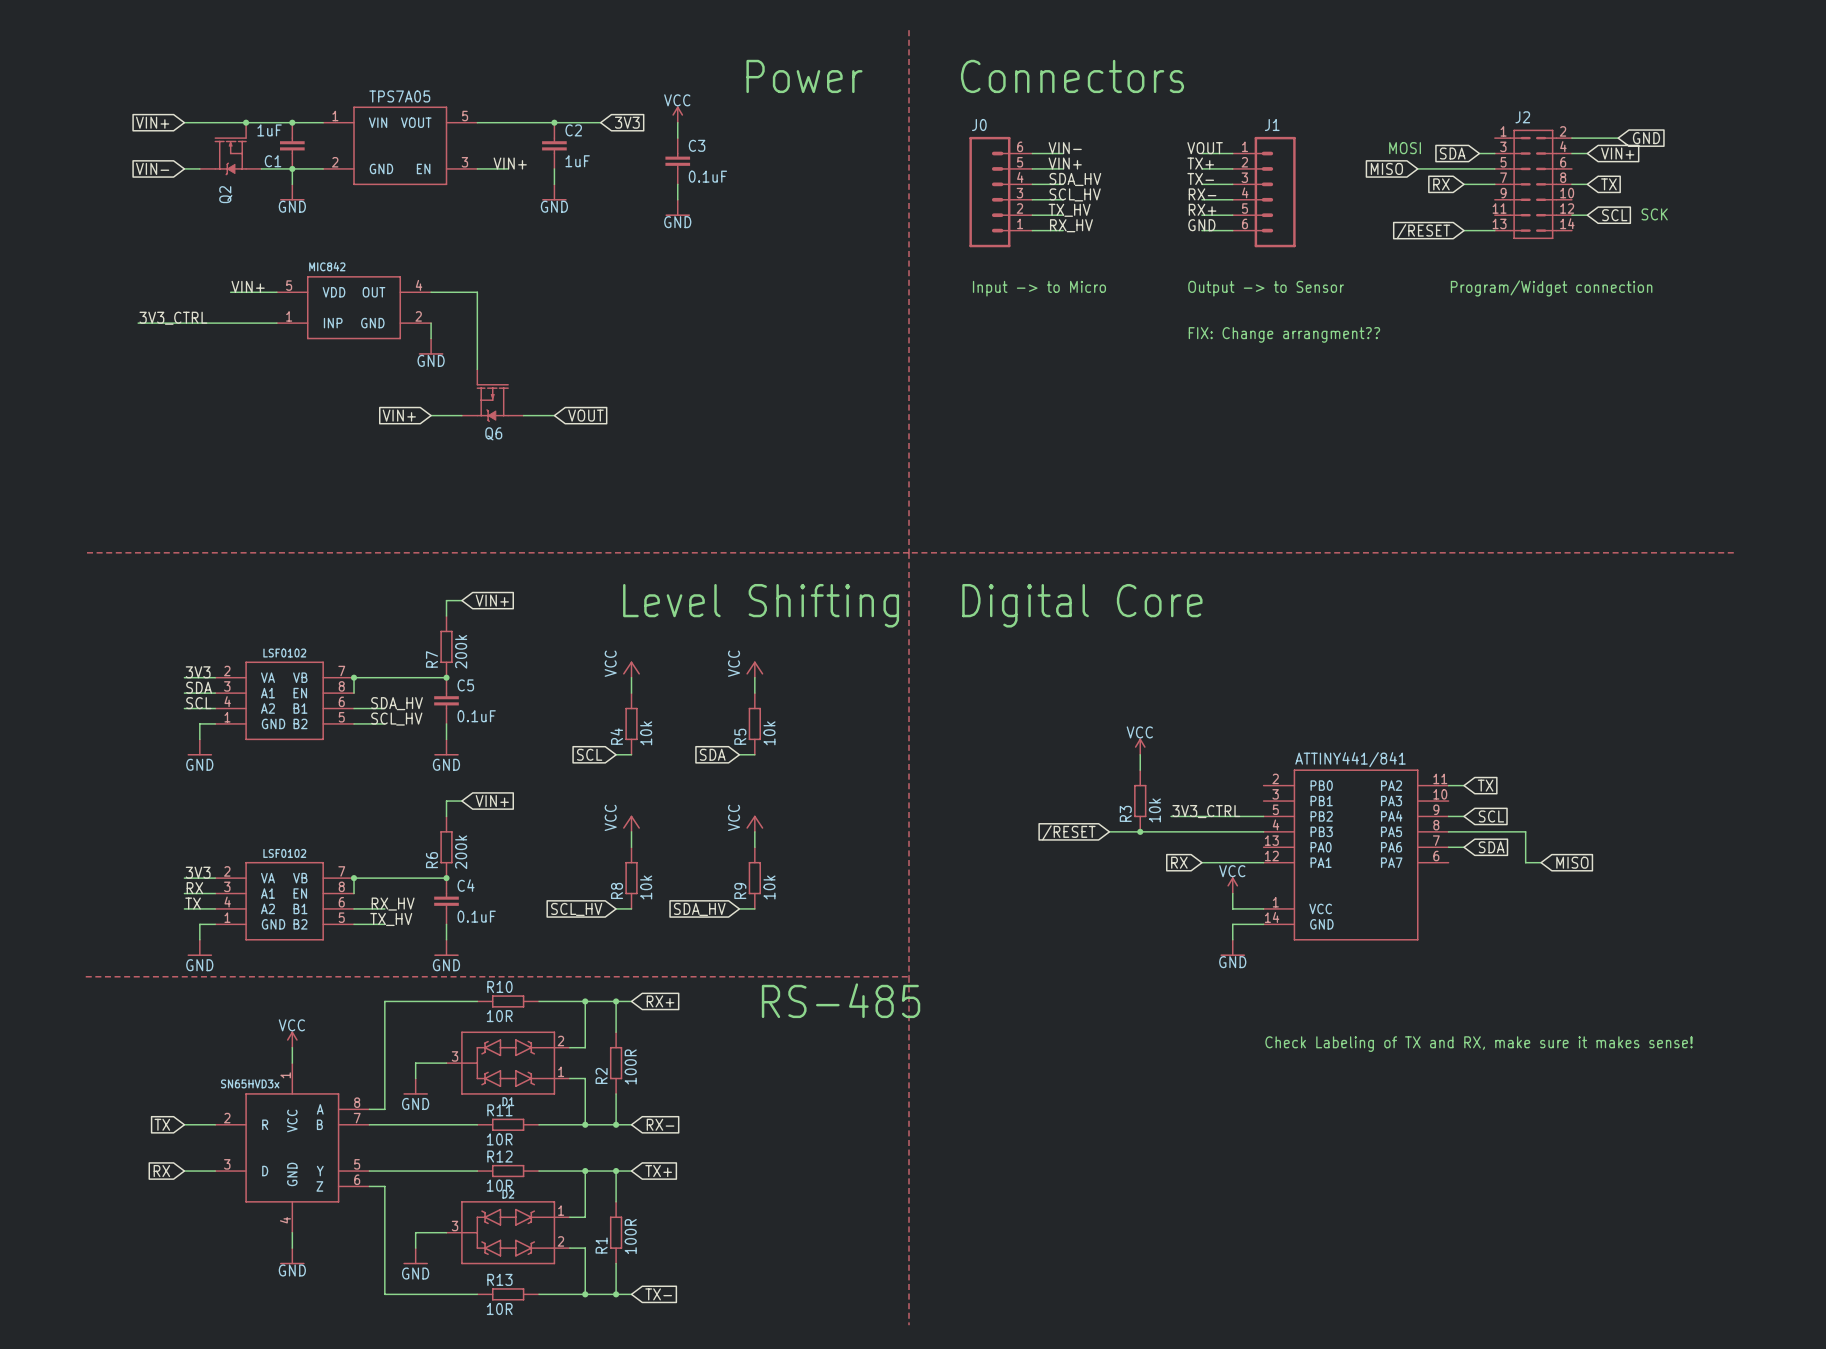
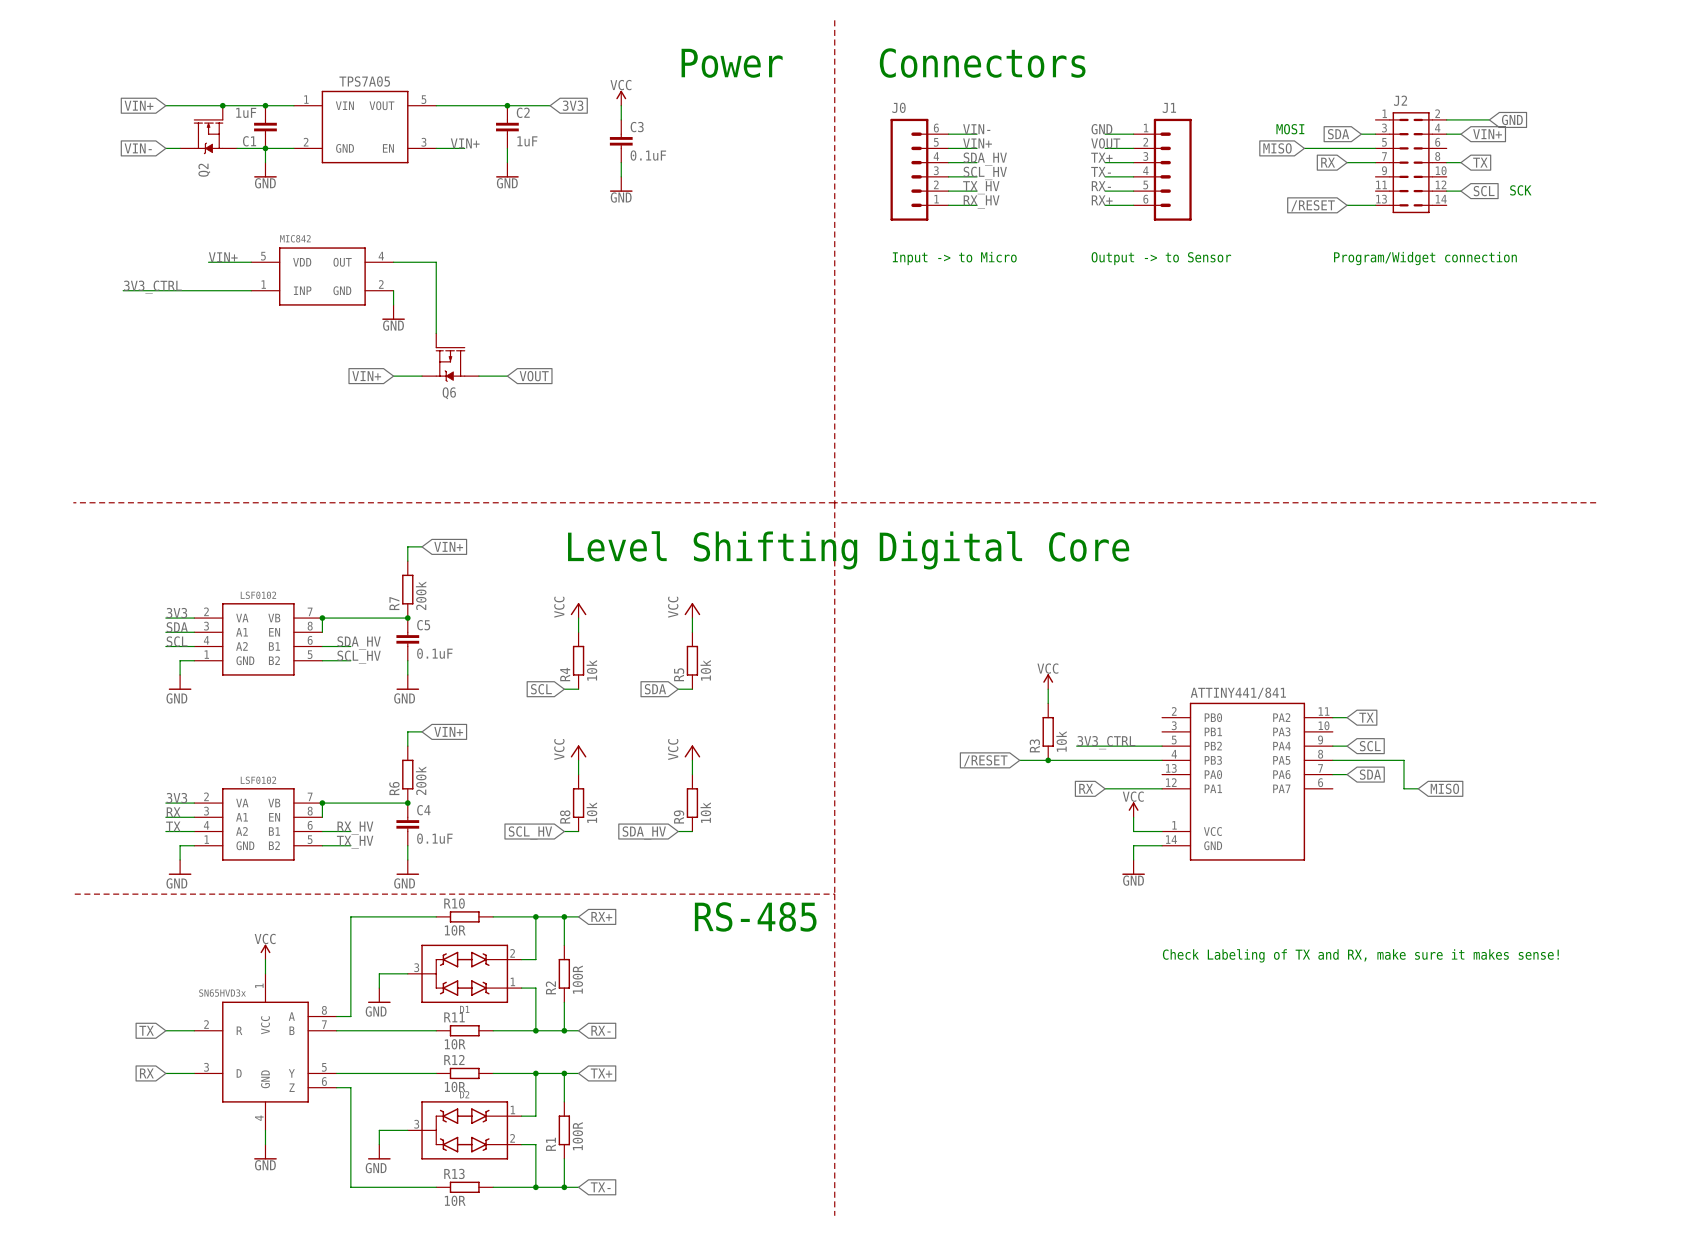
label: VOUT (1205, 148) -> GND (1101, 129)
label: TX+ (1200, 163) -> VOUT (1105, 143)
label: TX- (1200, 178) -> TX+ (1101, 157)
label: RX- (1202, 194) -> TX- (1101, 171)
label: RX+ (1202, 209) -> RX- (1101, 186)
label: GND (1201, 225) -> RX+ (1102, 200)
text: FIX: Change arrangment?? (1284, 334) -> none

